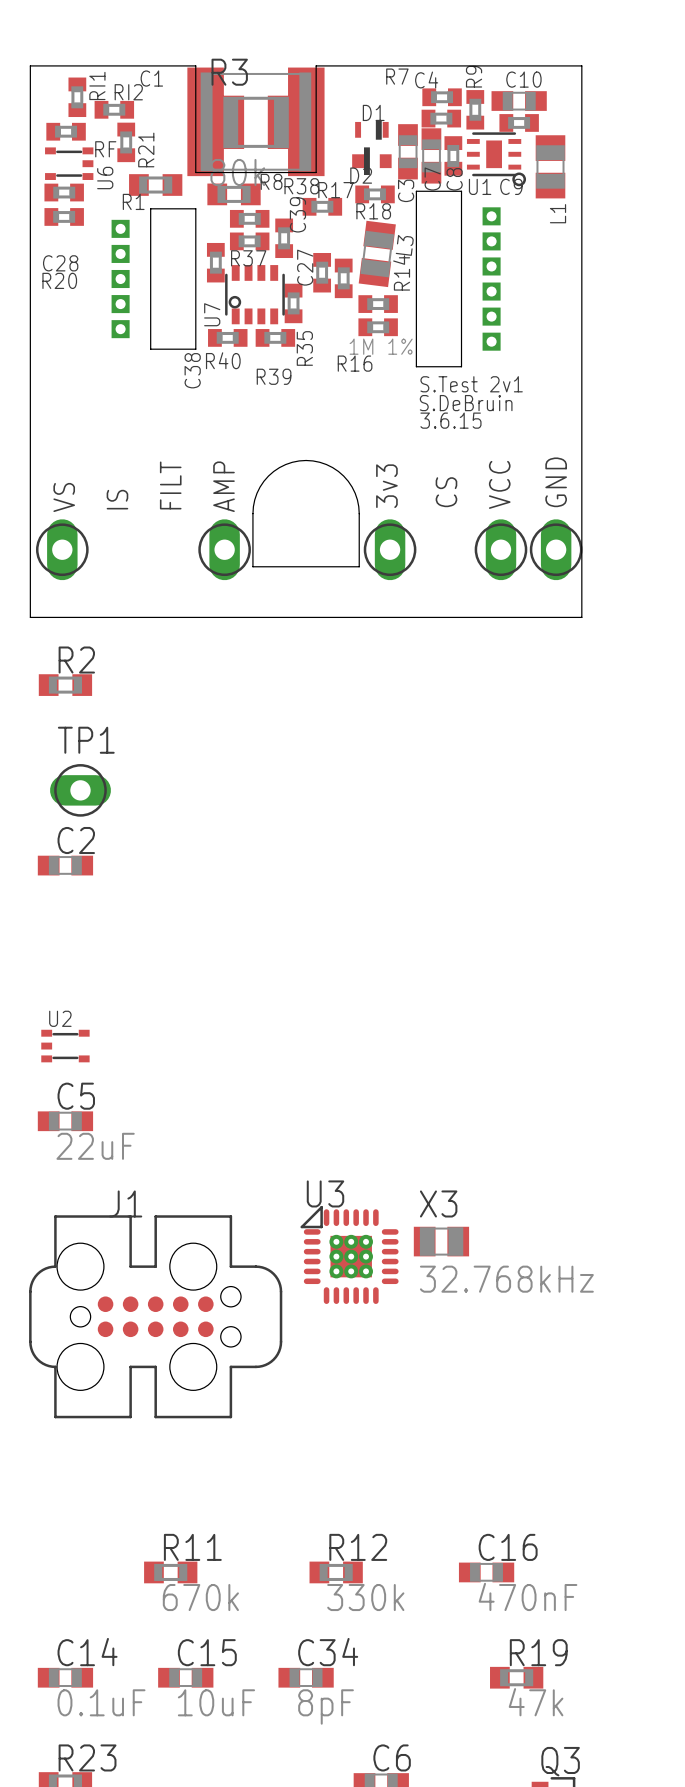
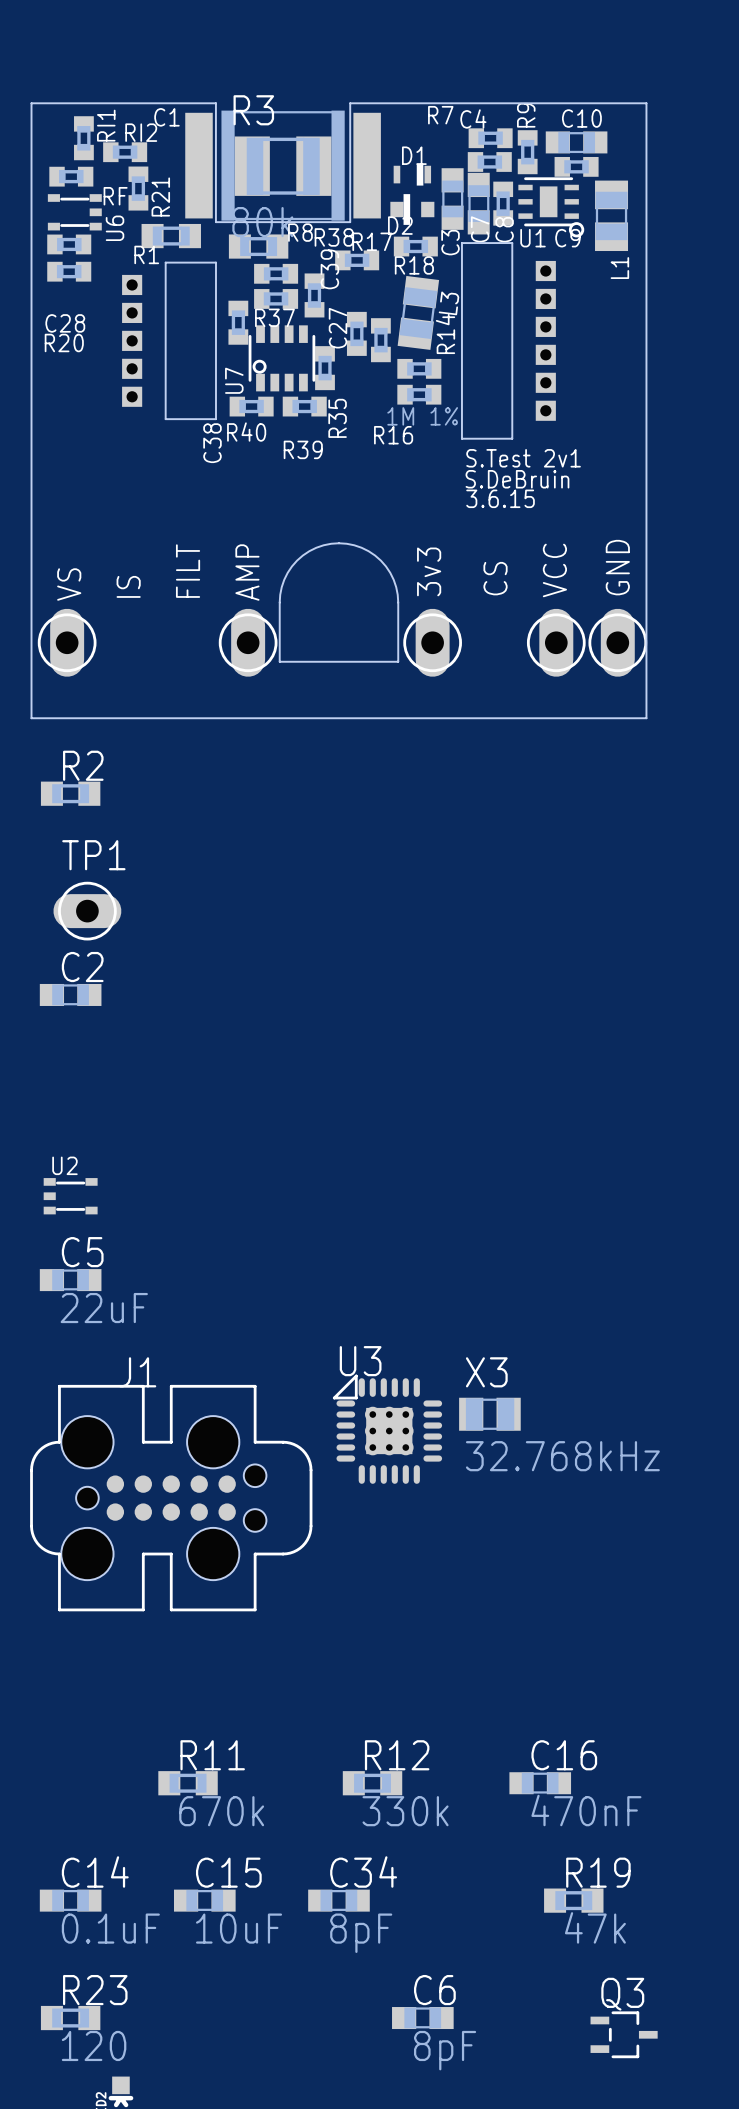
C1 footprint: [187, 67, 325, 177] -> [185, 110, 381, 221]

